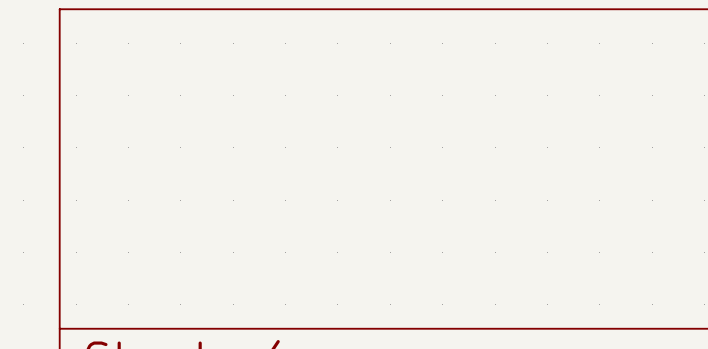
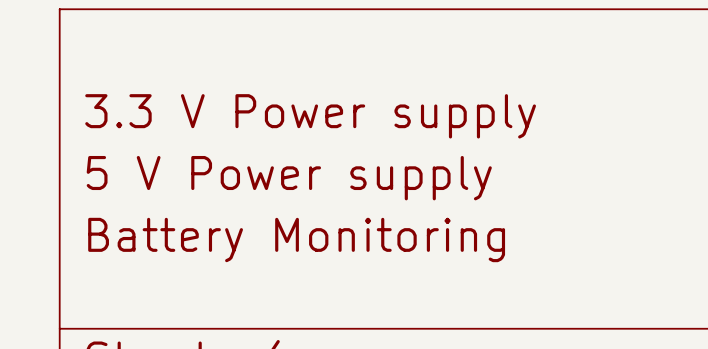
title block: none -> 3.3 V Power supply (310, 116)
title block: none -> 5 V Power supply (289, 178)
title block: none -> Battery Monitoring (296, 240)

